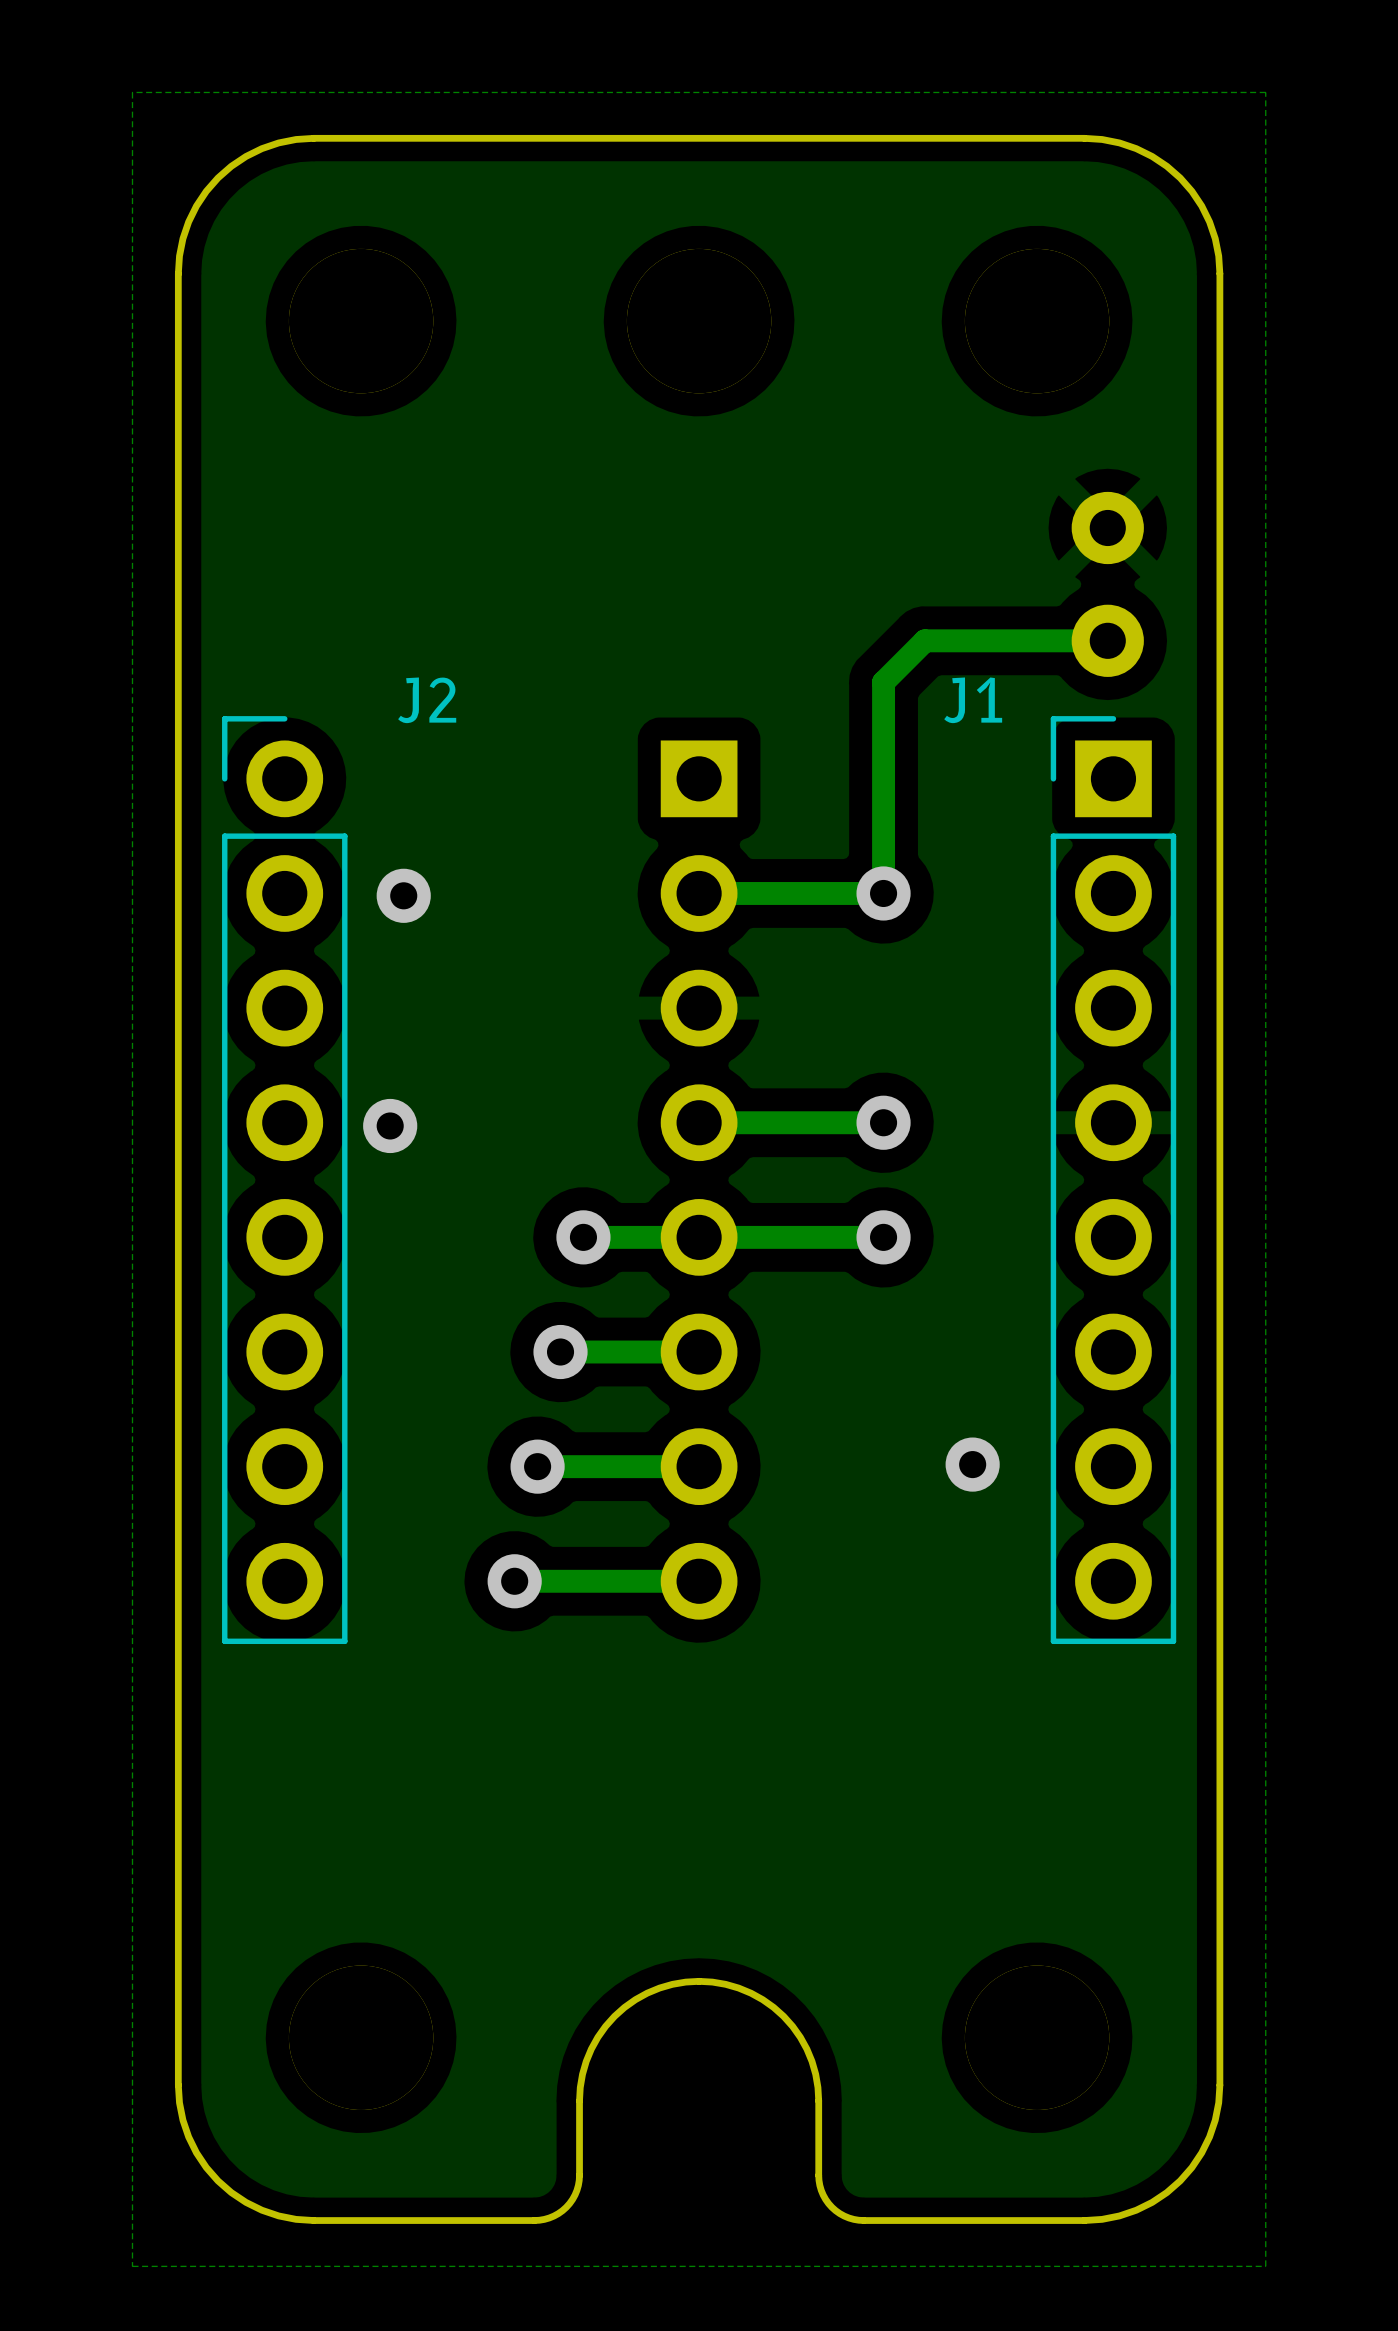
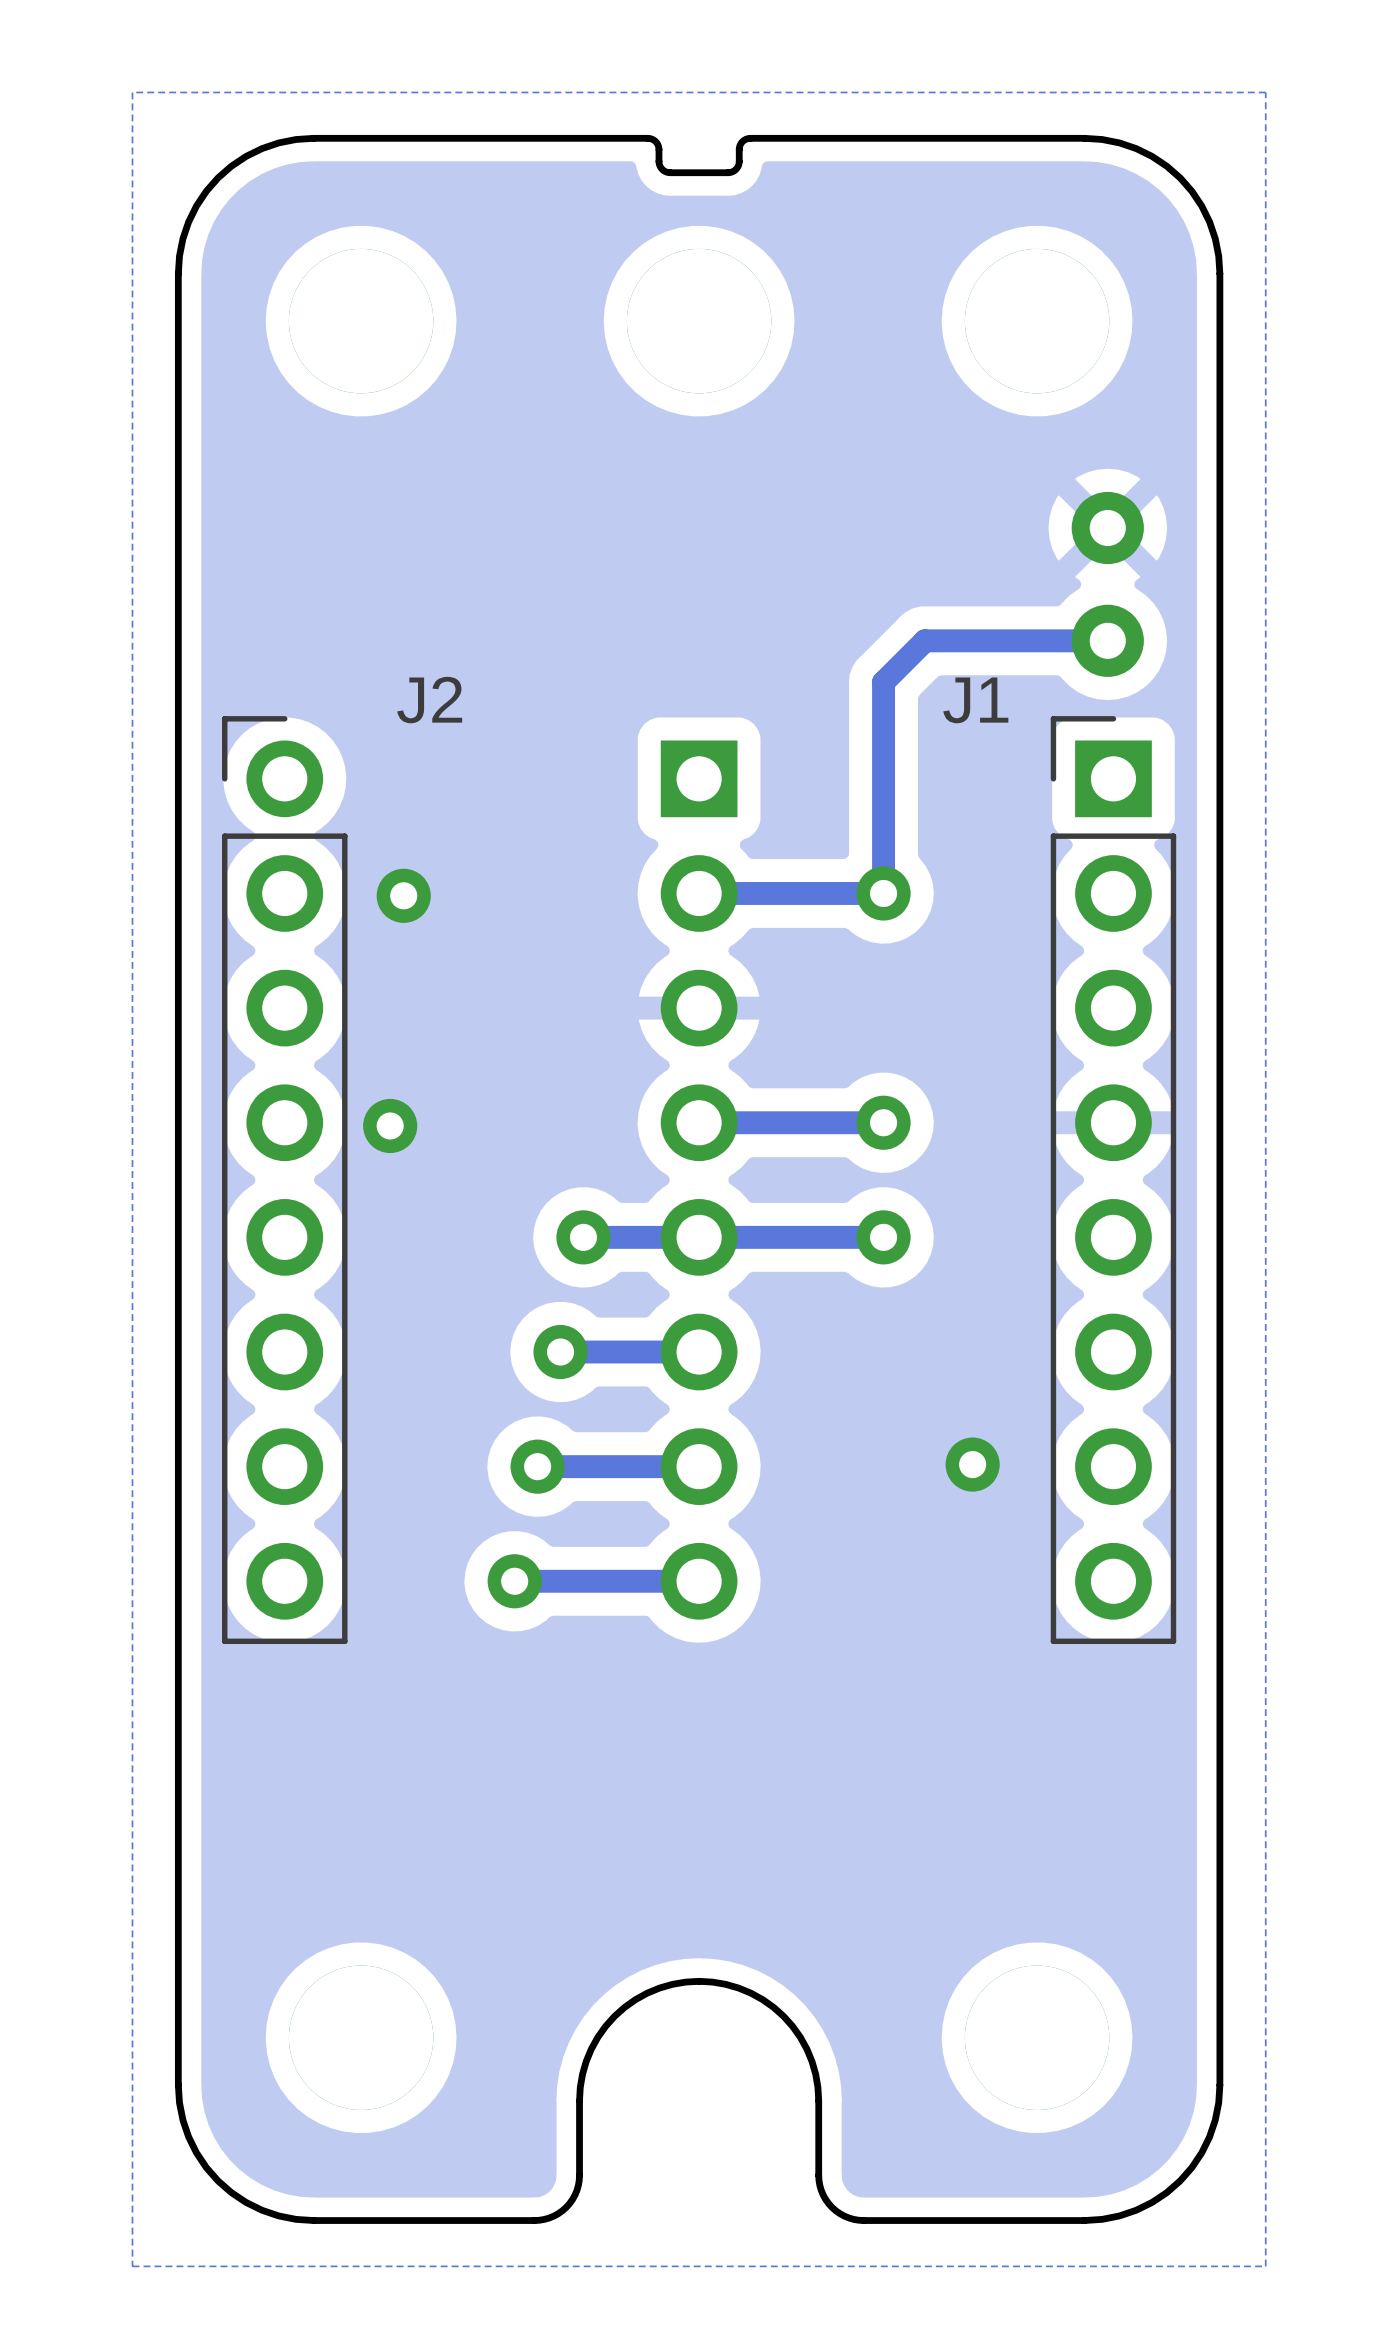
board edge: (750, 138) (647, 138) -> (750, 138) (740, 143) (738, 166) (733, 170) (727, 172) (665, 171) (659, 163) (657, 144) (653, 140) (647, 138)

